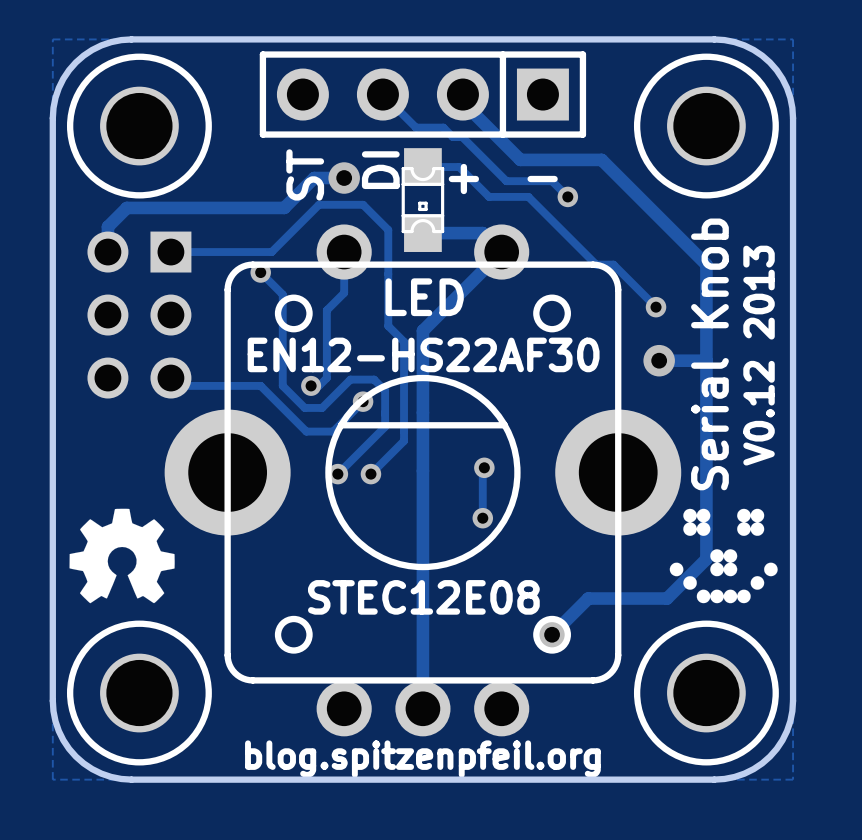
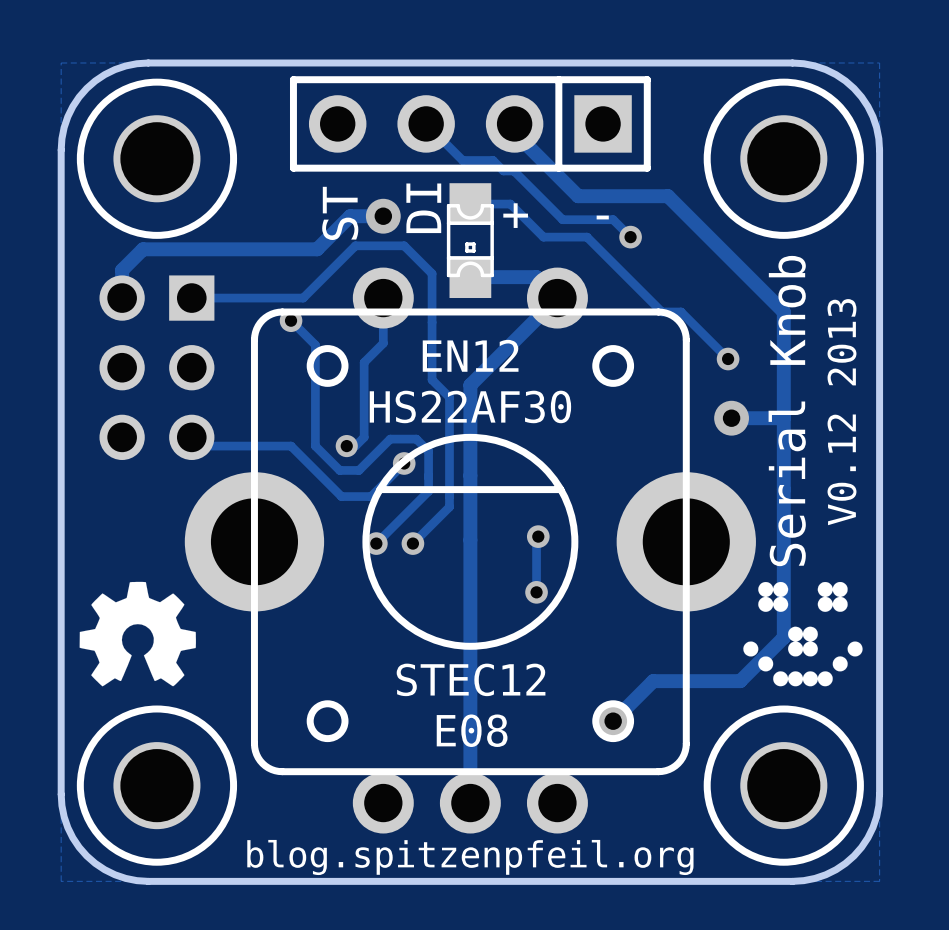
part value: LED (424, 297) -> none
text: none -> EN12 (470, 355)
text: EN12-HS22AF30 (423, 354) -> HS22AF30 (470, 406)
text: STEC12E08 (423, 597) -> STEC12 (471, 679)
text: none -> E08 (472, 730)

